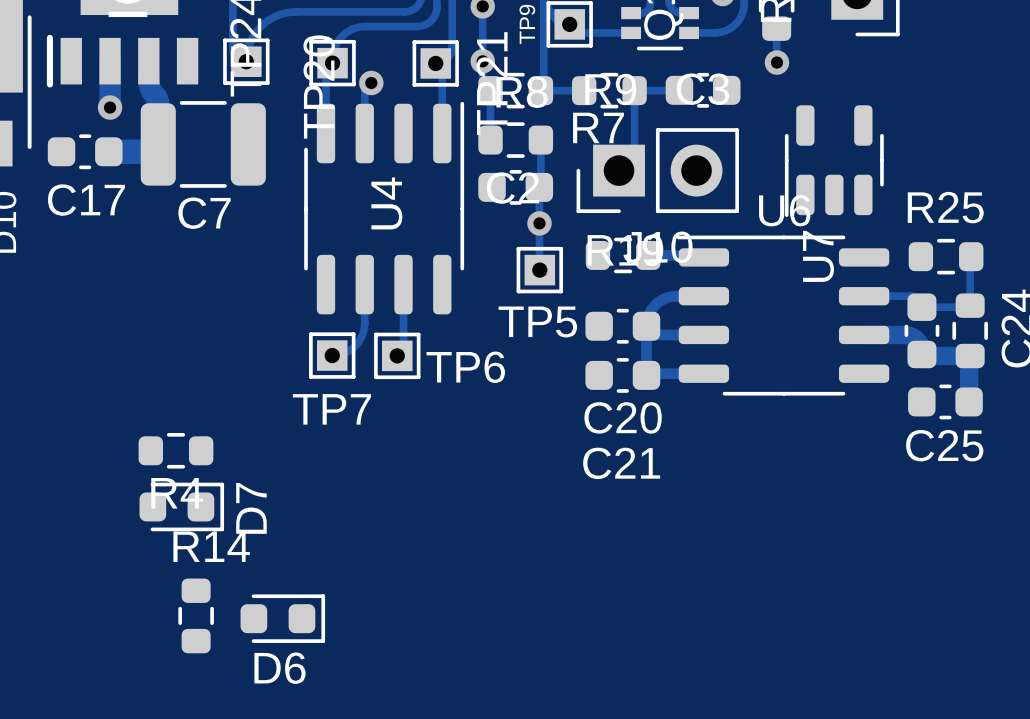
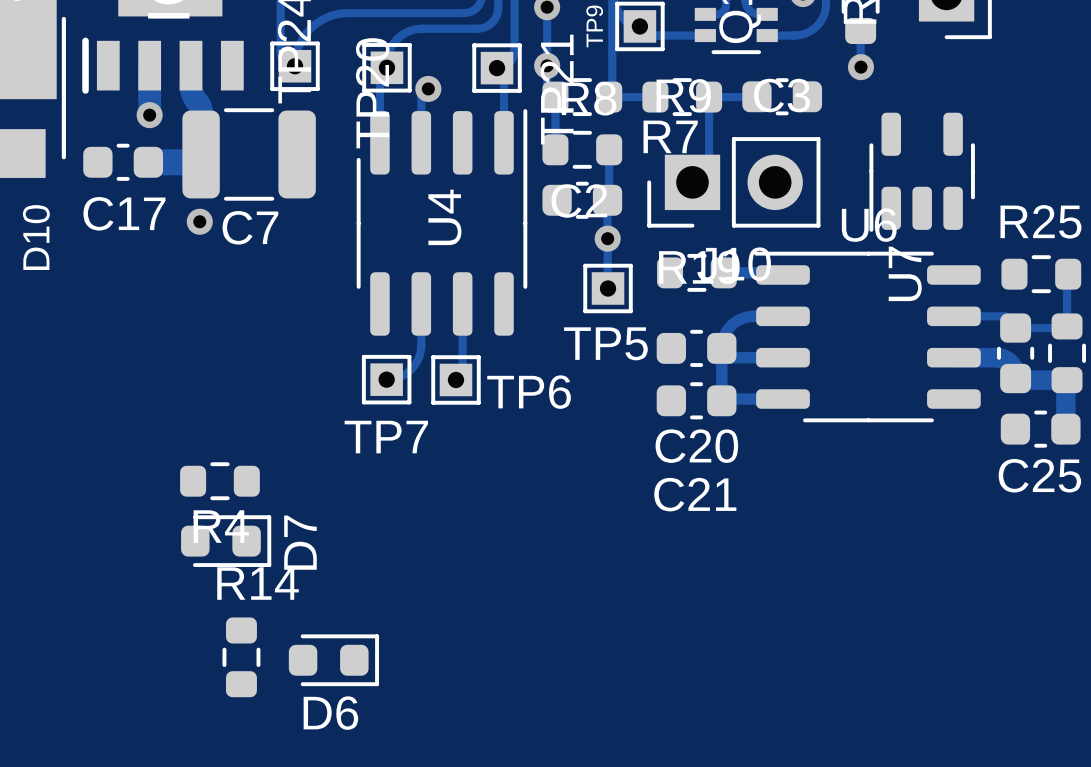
via: none -> (199, 221)

